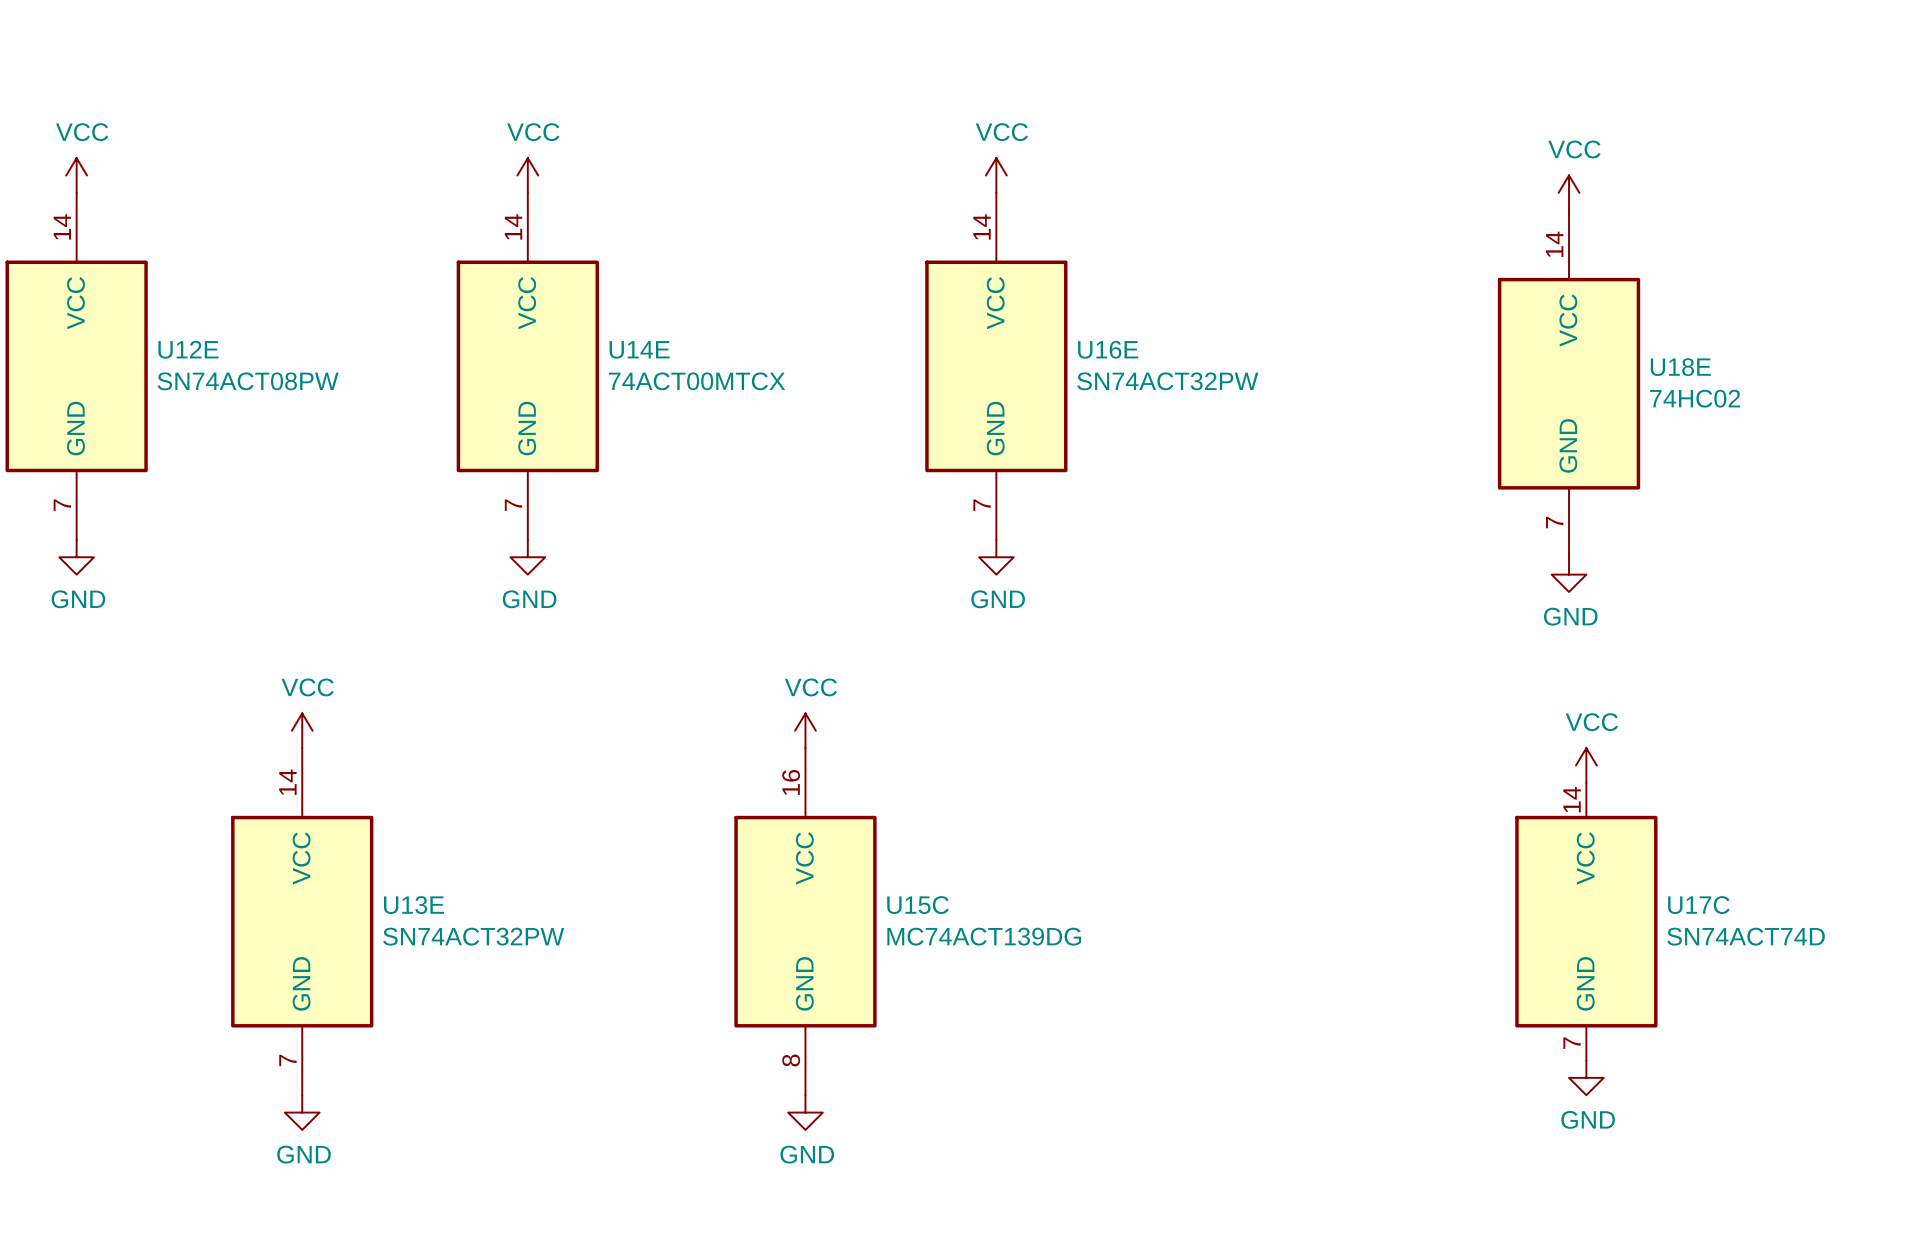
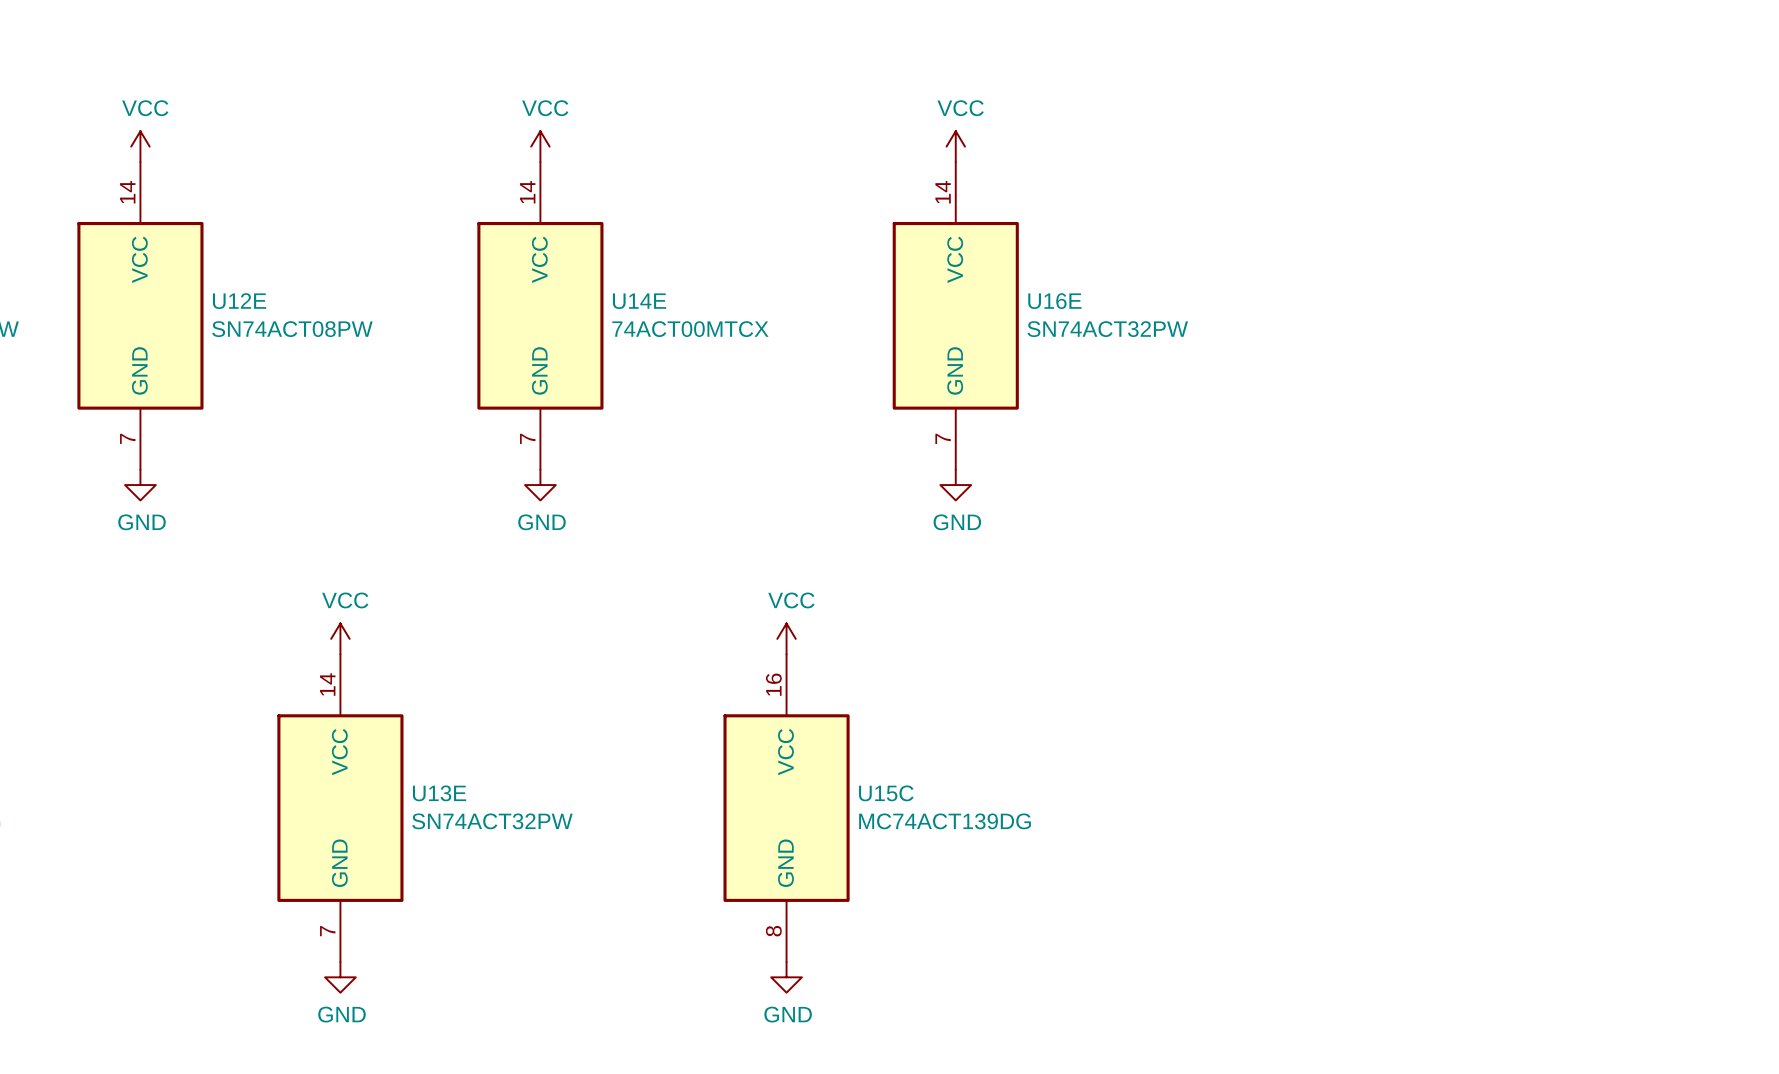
power symbol: VCC (1569, 192) -> none
U18E: 74HC02 (1569, 383) -> none
power symbol: GND (1569, 574) -> none
power symbol: VCC (1586, 765) -> none
U17C: SN74ACT74D (1586, 921) -> none
power symbol: GND (1586, 1077) -> none

